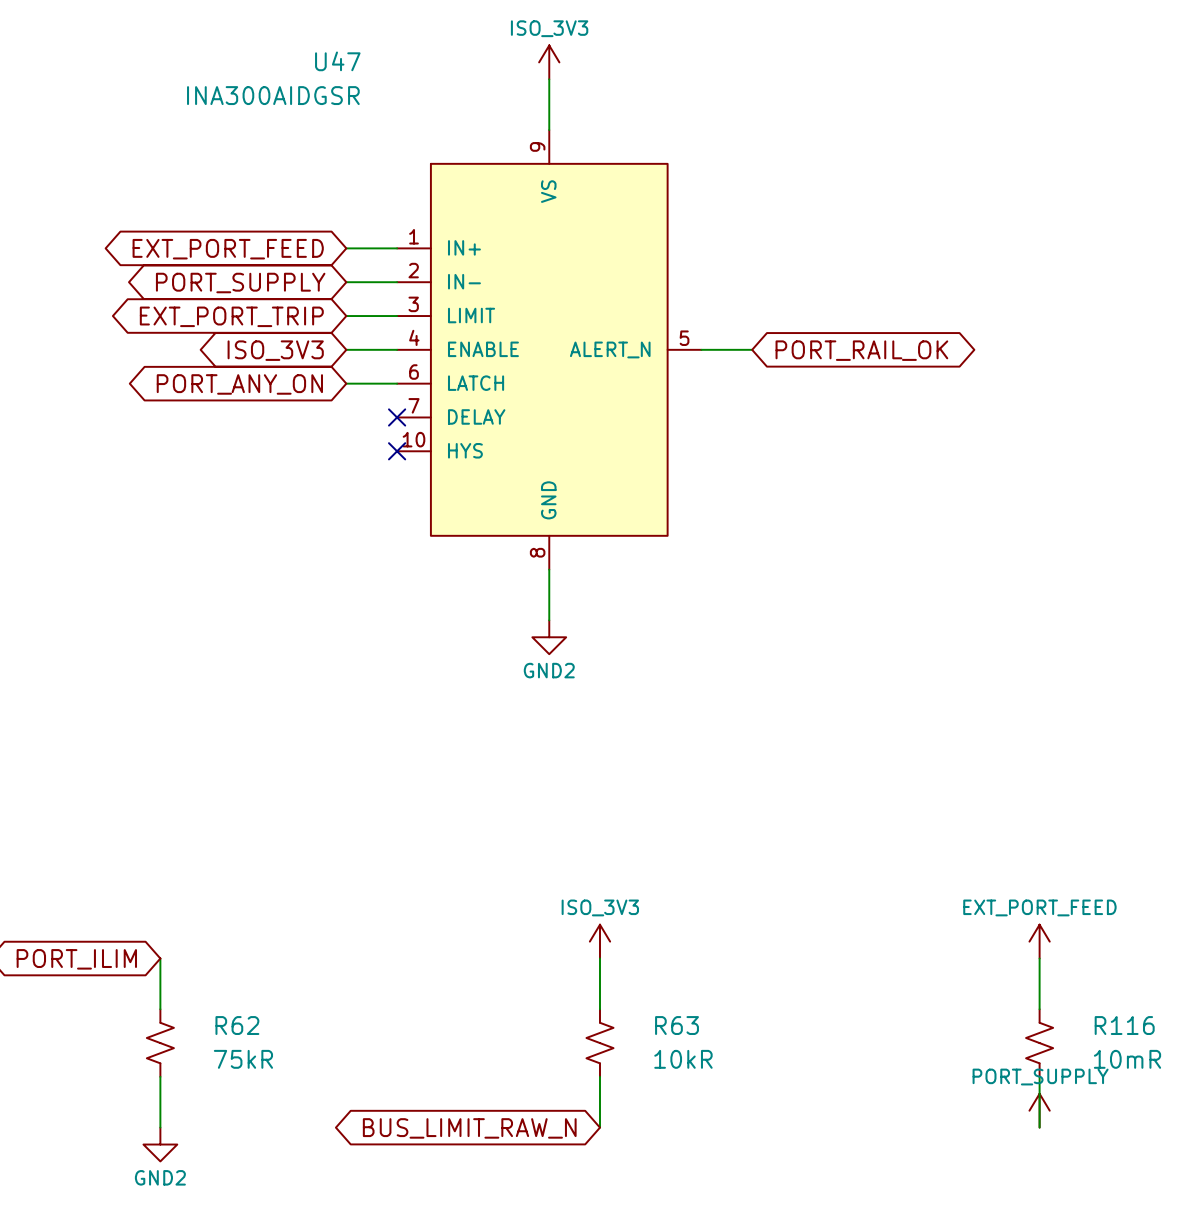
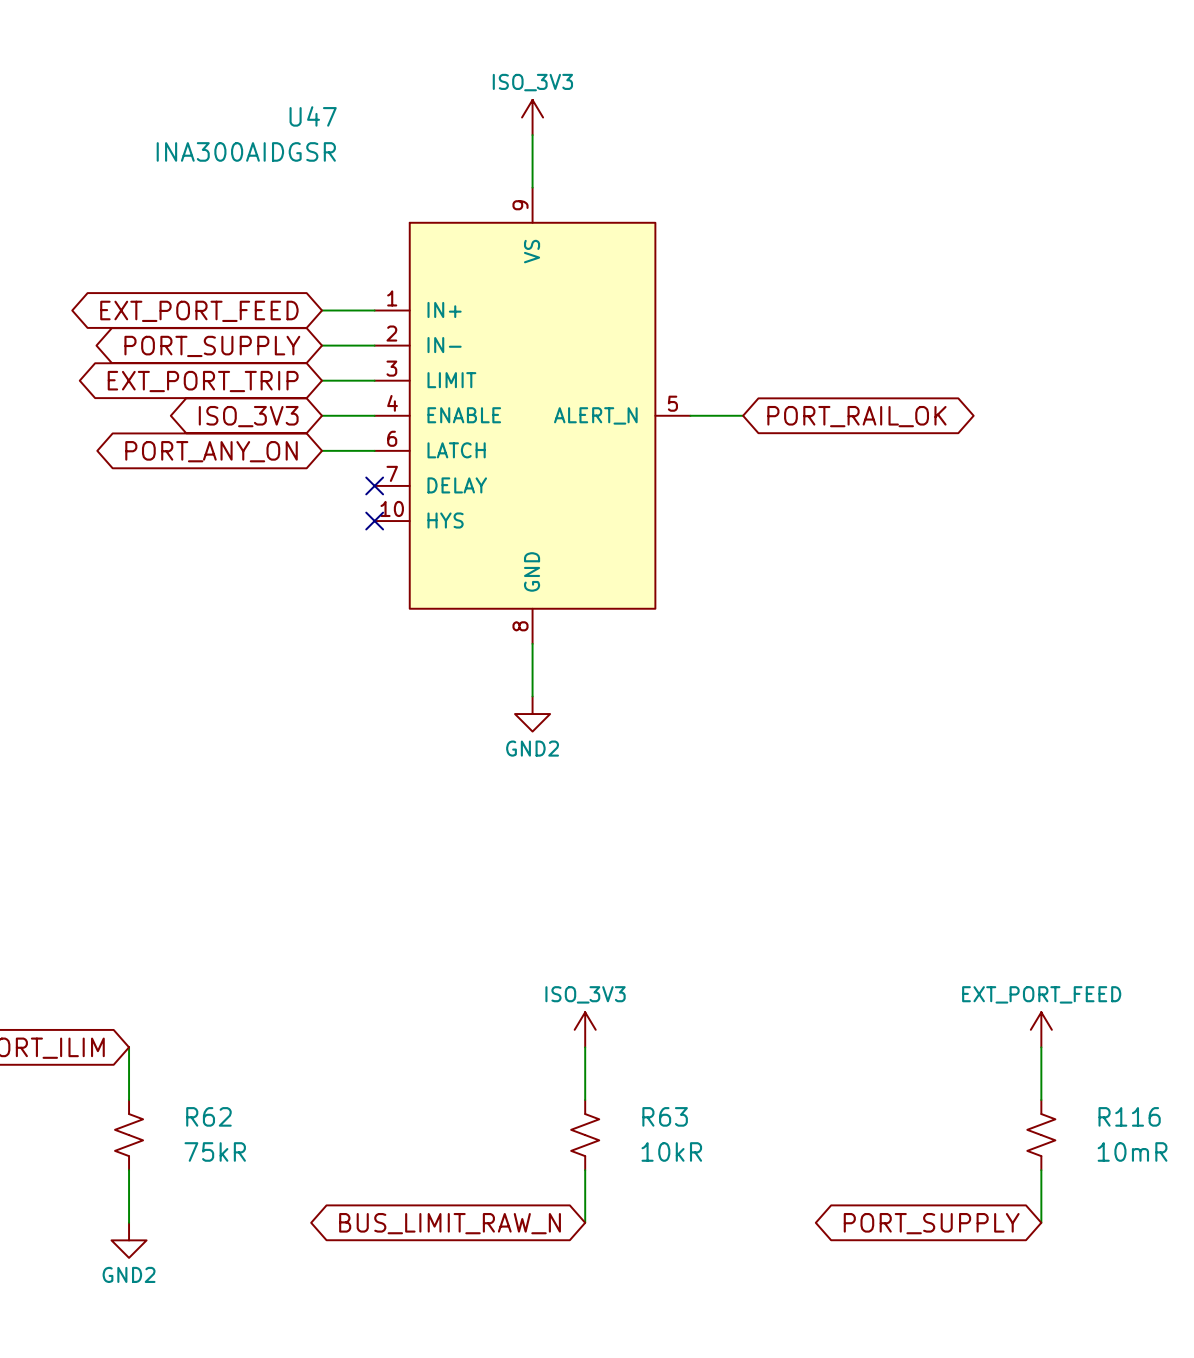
power symbol: PORT_SUPPLY (1039, 1110) -> none
global label: none -> PORT_SUPPLY (931, 1223)

